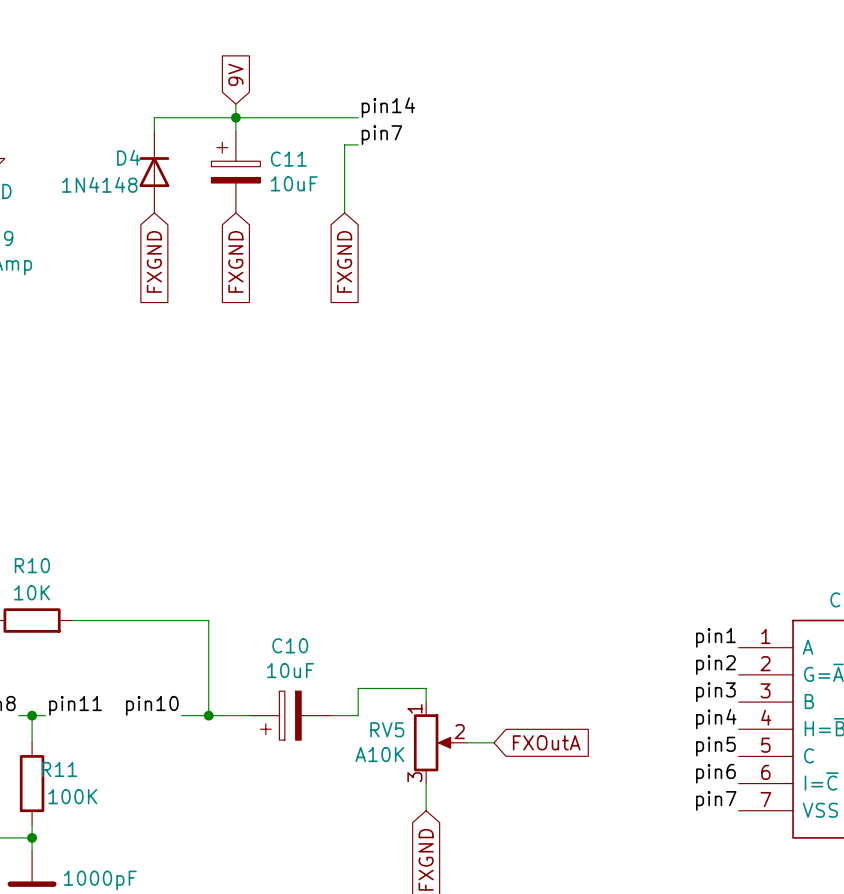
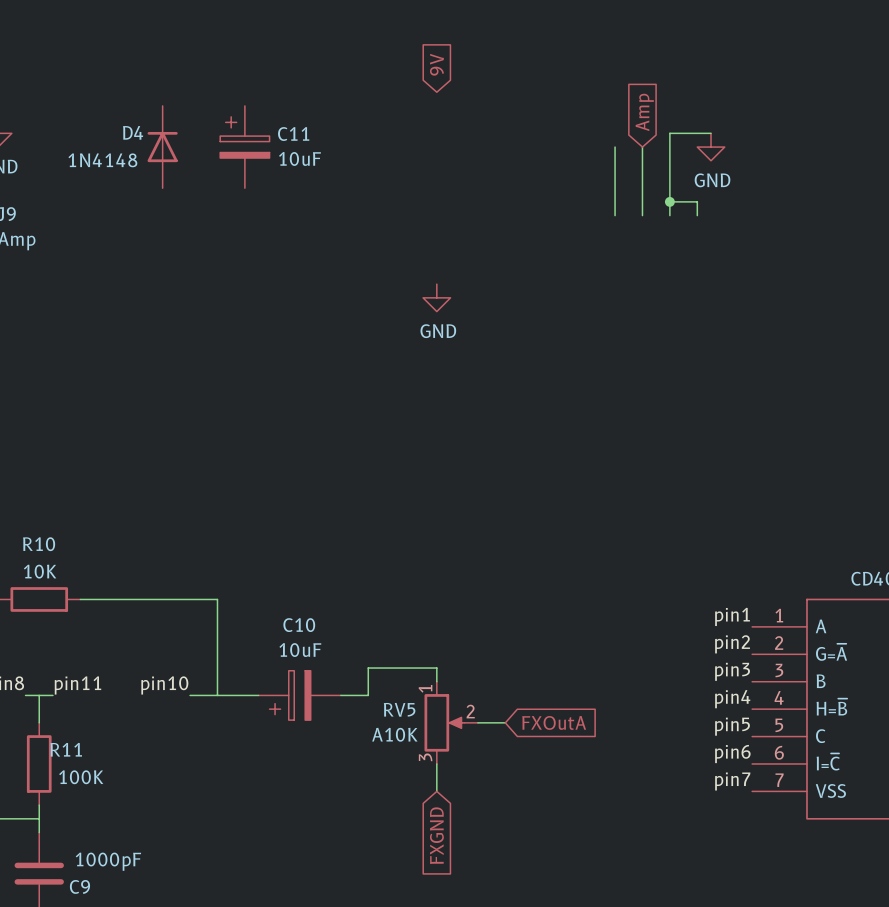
global label position: 9V (235, 74) -> 9V (436, 64)
wire: (235, 104) (235, 131) -> none
label: pin14 (388, 107) -> none
junction: (235, 117) -> none
wire: (358, 117) (154, 117) (154, 131) -> none
label: pin7 (381, 135) -> none
global label: none -> Amp (644, 112)
wire: (358, 144) (344, 144) (344, 212) -> none
wire: none -> (711, 133) (669, 133) (669, 215)
wire: none -> (615, 147) (615, 215)
wire: none -> (642, 147) (642, 215)
power symbol: none -> GND (711, 147)
wire: none -> (669, 201) (697, 201) (697, 215)
junction: none -> (669, 201)
global label: FXGND (154, 261) -> none
global label: FXGND (235, 261) -> none
global label: FXGND (344, 261) -> none
power symbol: none -> GND (436, 297)
junction: (32, 715) -> none
junction: (208, 715) -> none
junction: (32, 837) -> none

